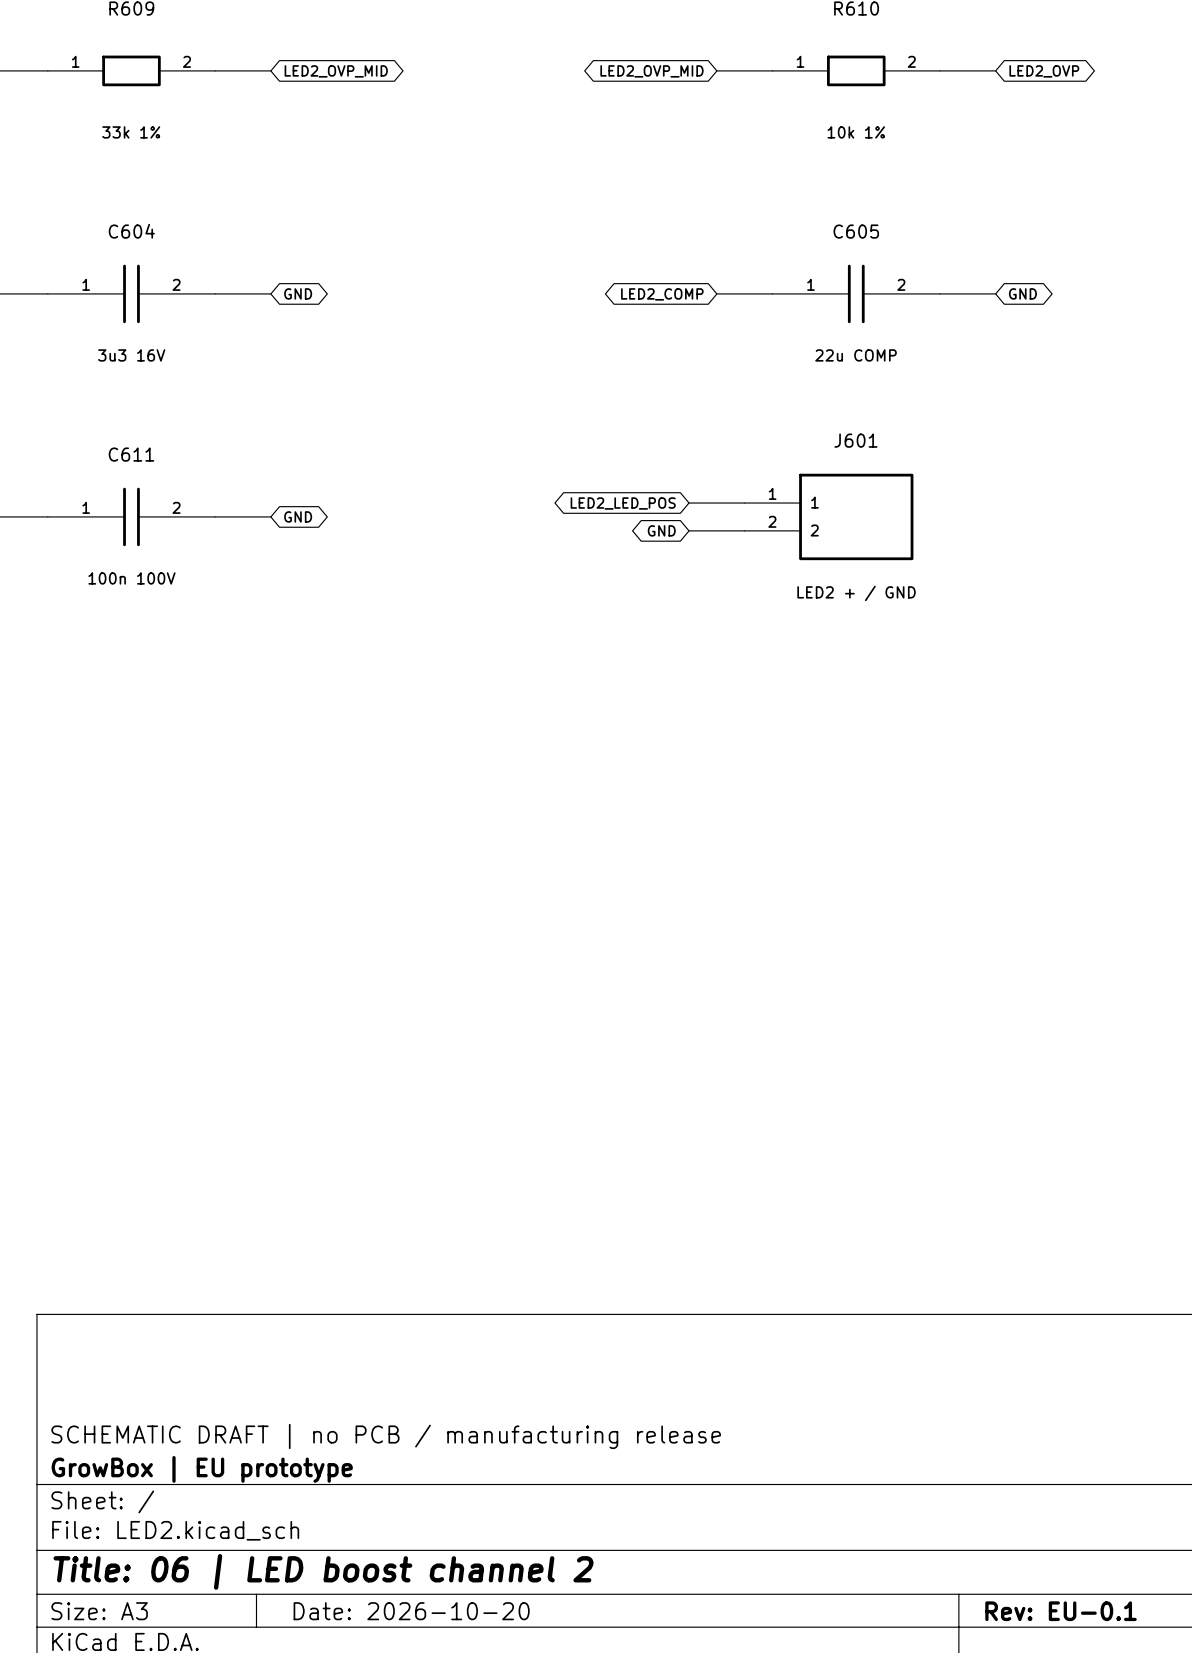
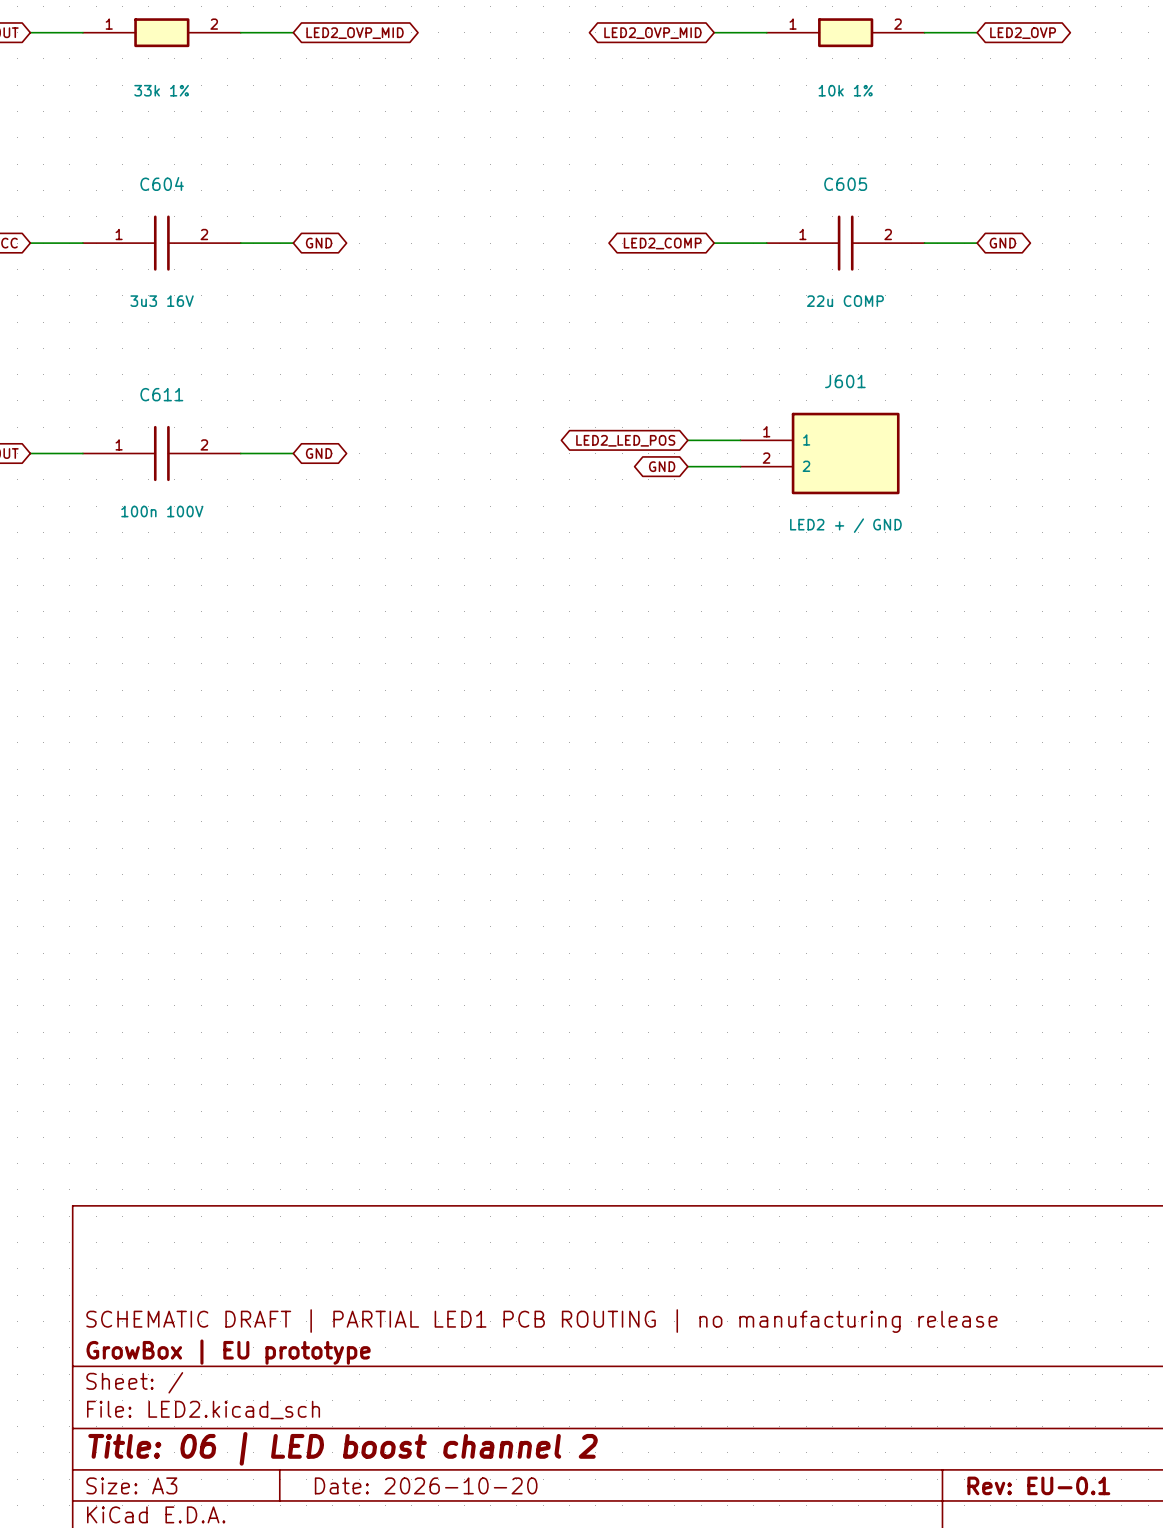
title block: SCHEMATIC DRAFT | no PCB / manufacturing release (386, 1436) -> SCHEMATIC DRAFT | PARTIAL LED1 PCB ROUTING | no manufacturing release (541, 1321)

